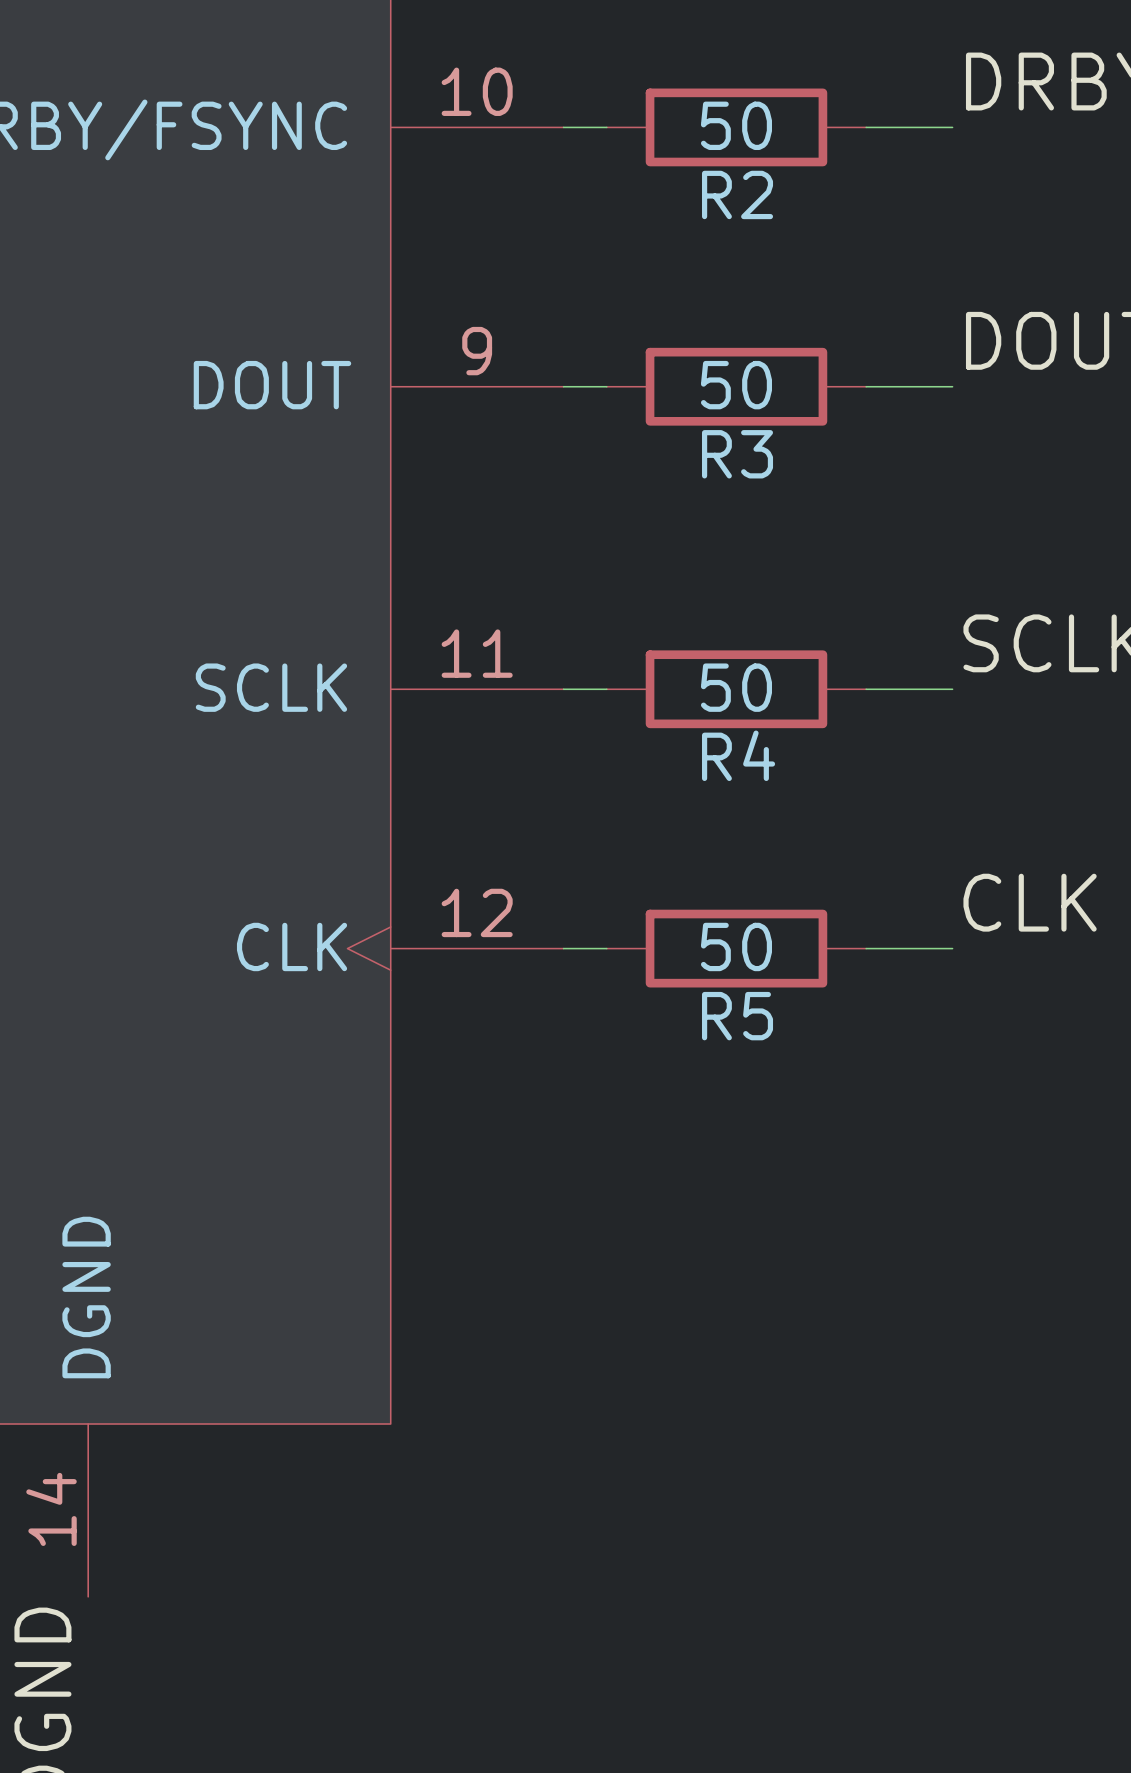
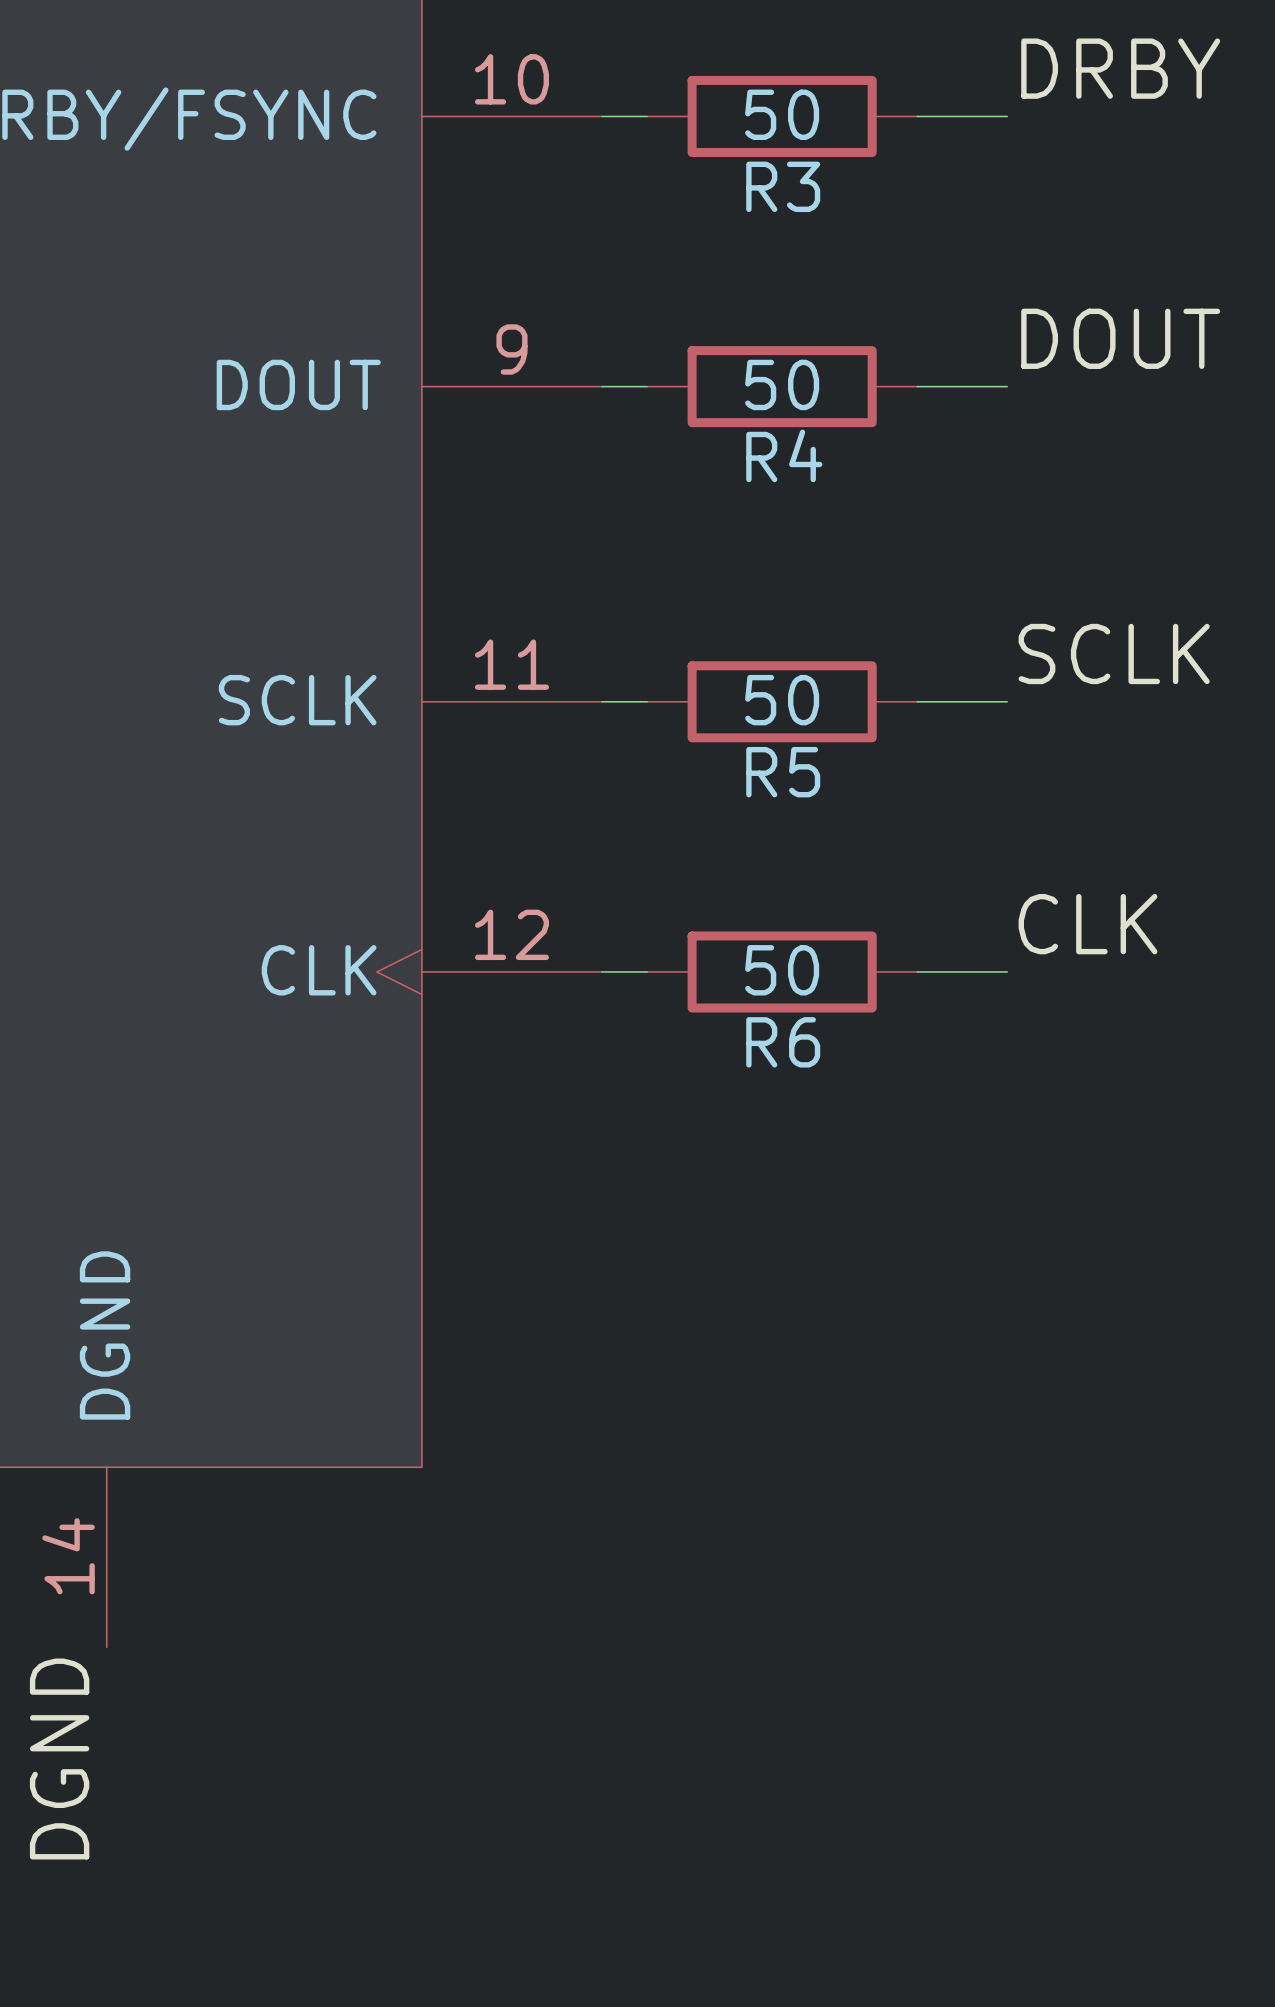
R2 name: R2 (737, 194) -> R3 (783, 186)
R3 name: R3 (737, 454) -> R4 (784, 455)
R4 name: R4 (738, 755) -> R5 (783, 772)
R5 name: R5 (737, 1016) -> R6 (783, 1042)

